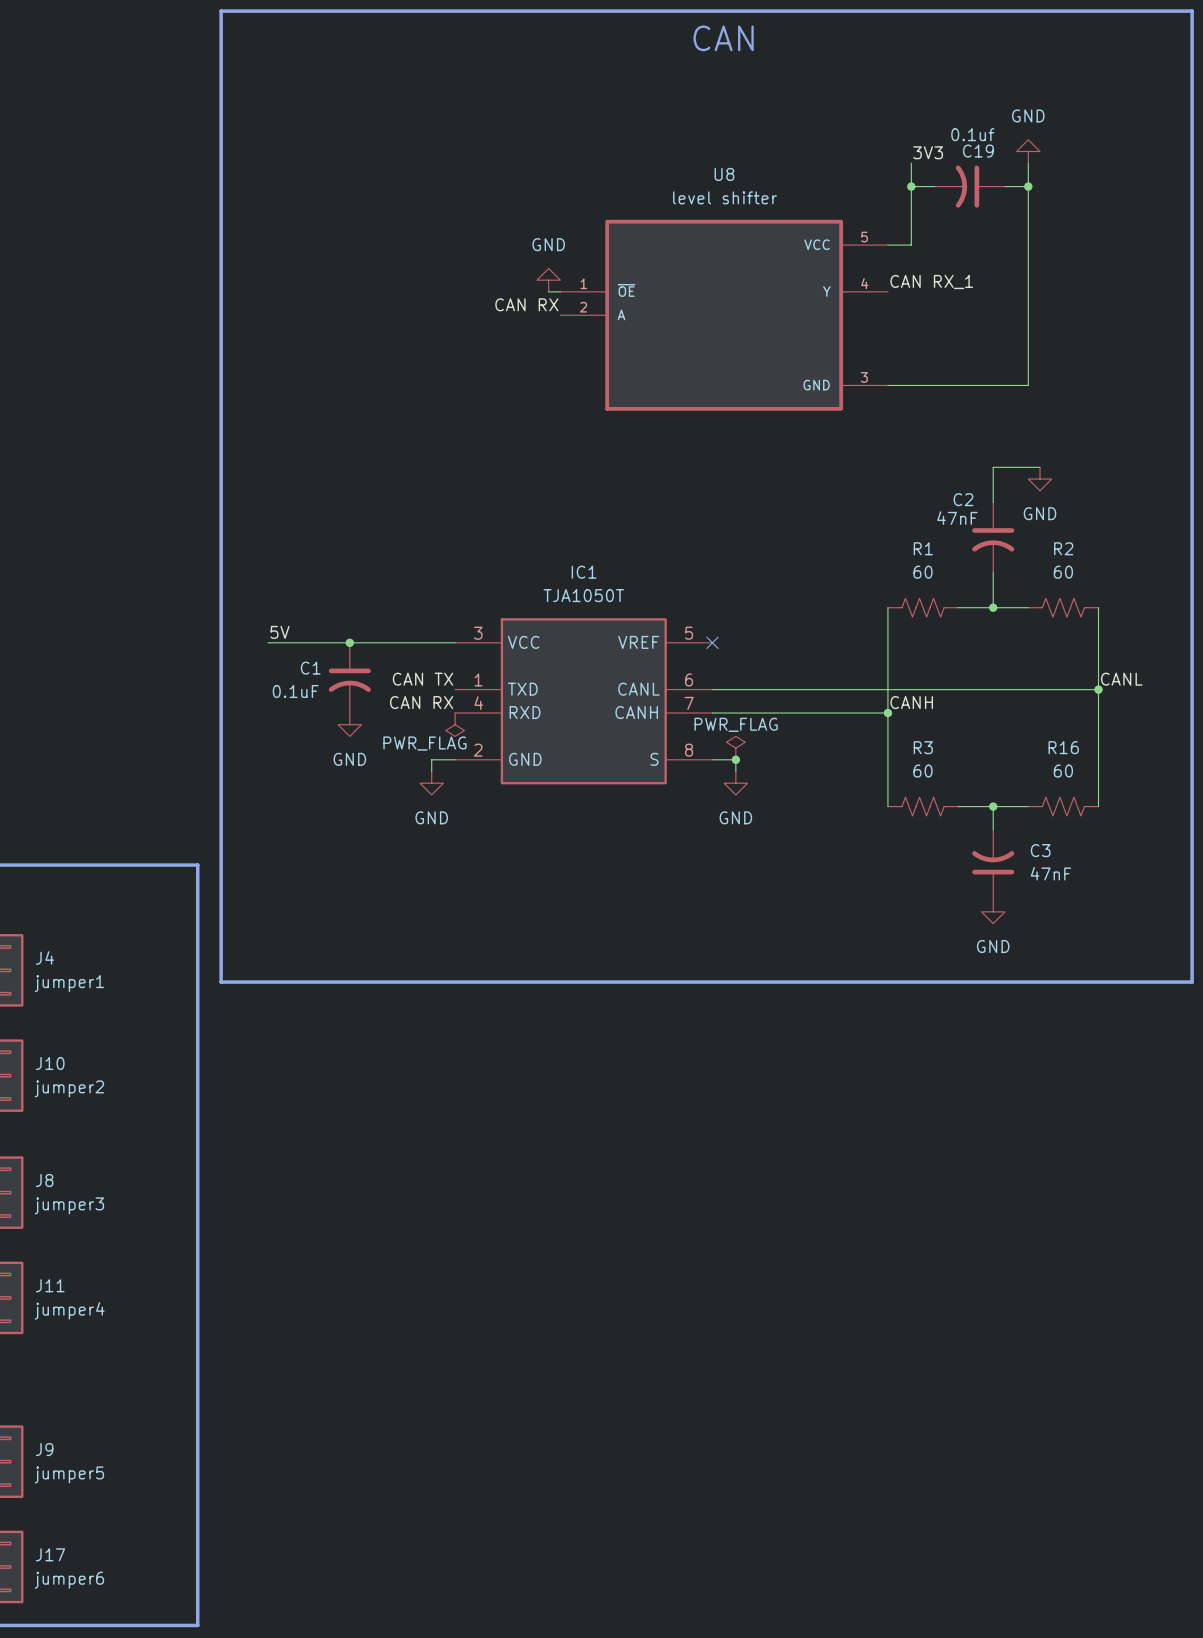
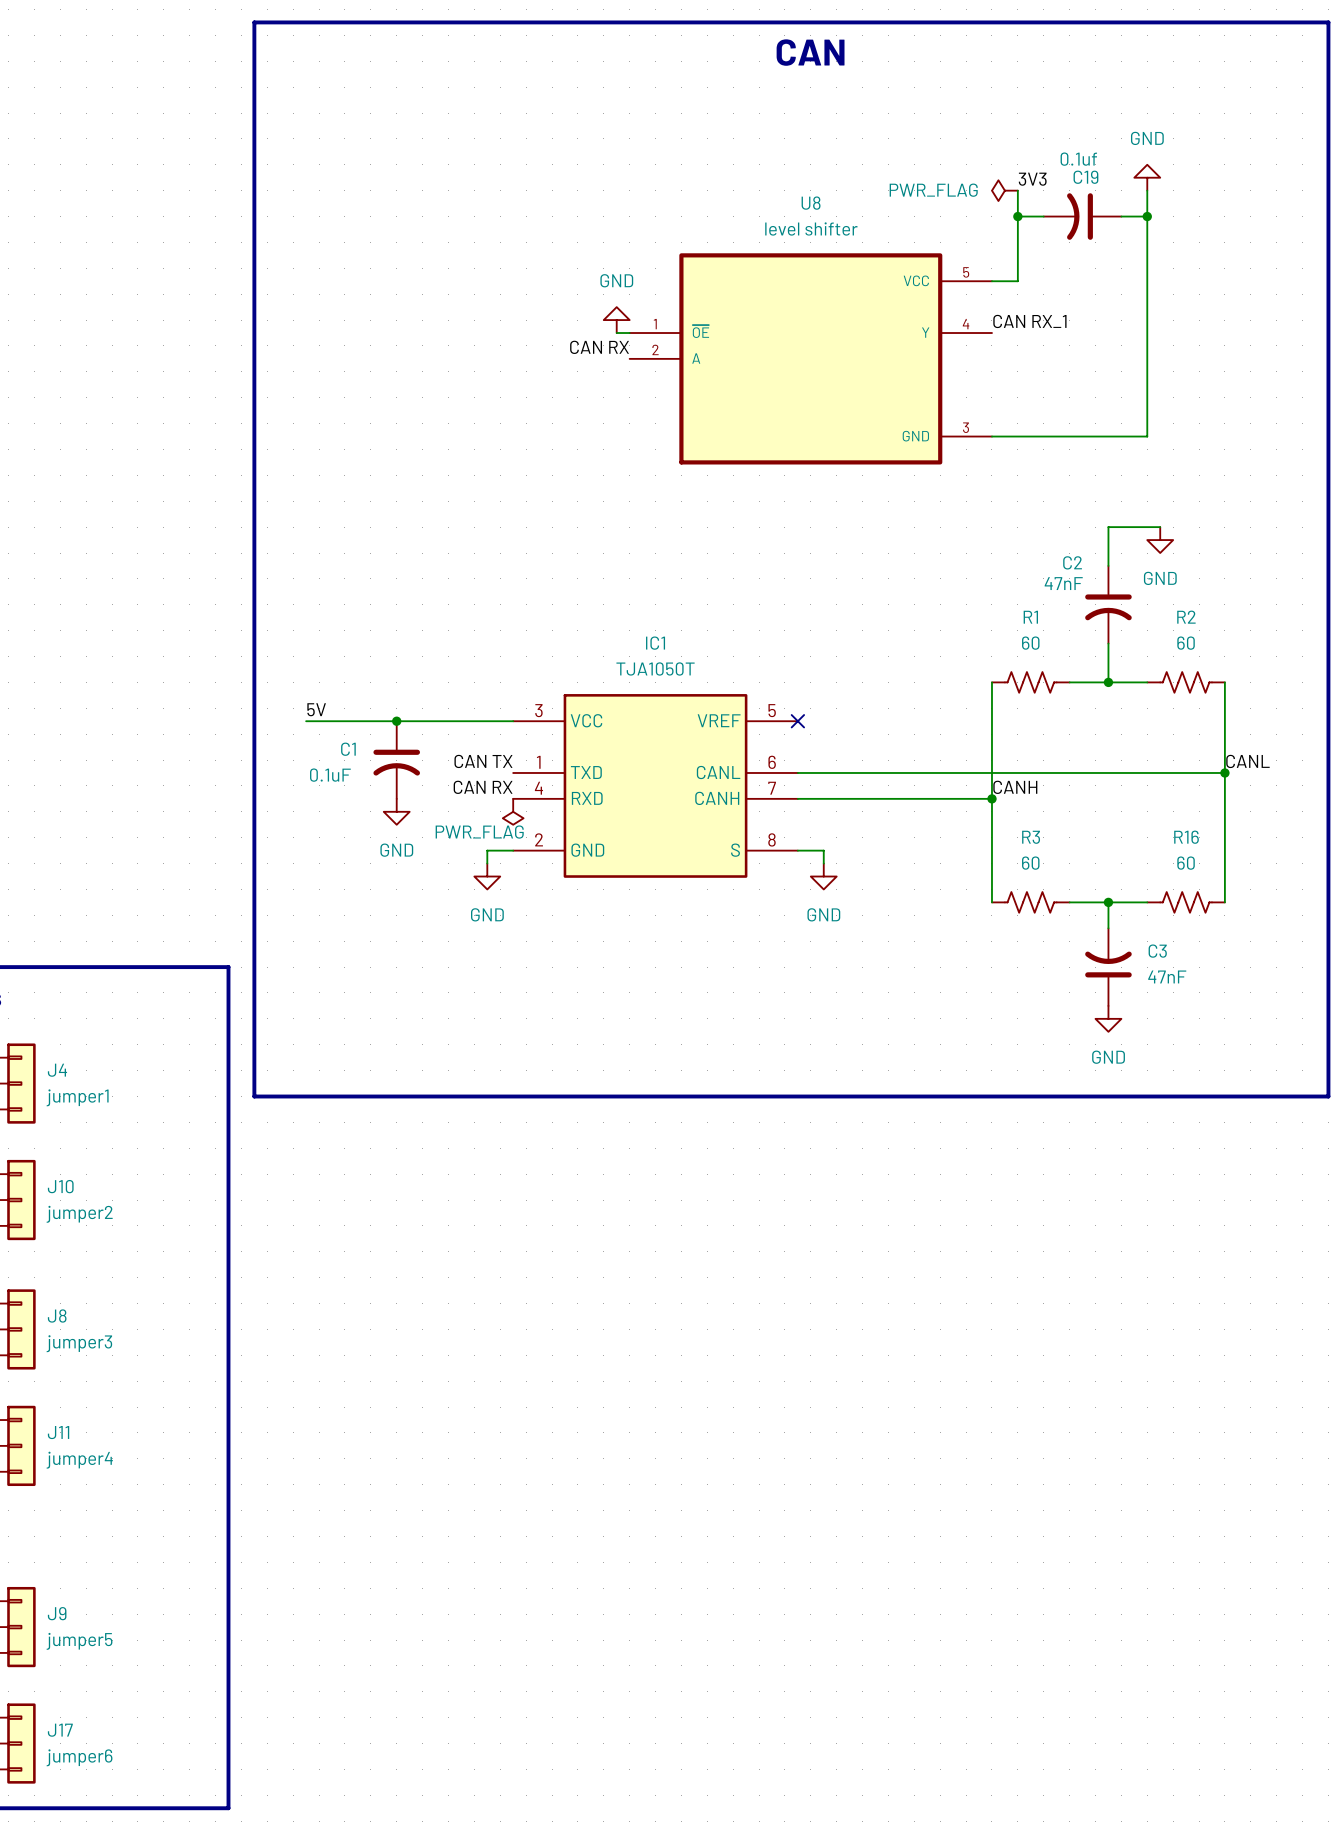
power symbol: none -> PWR_FLAG (1004, 190)
power symbol: PWR_FLAG (735, 748) -> none
junction: (735, 759) -> none

